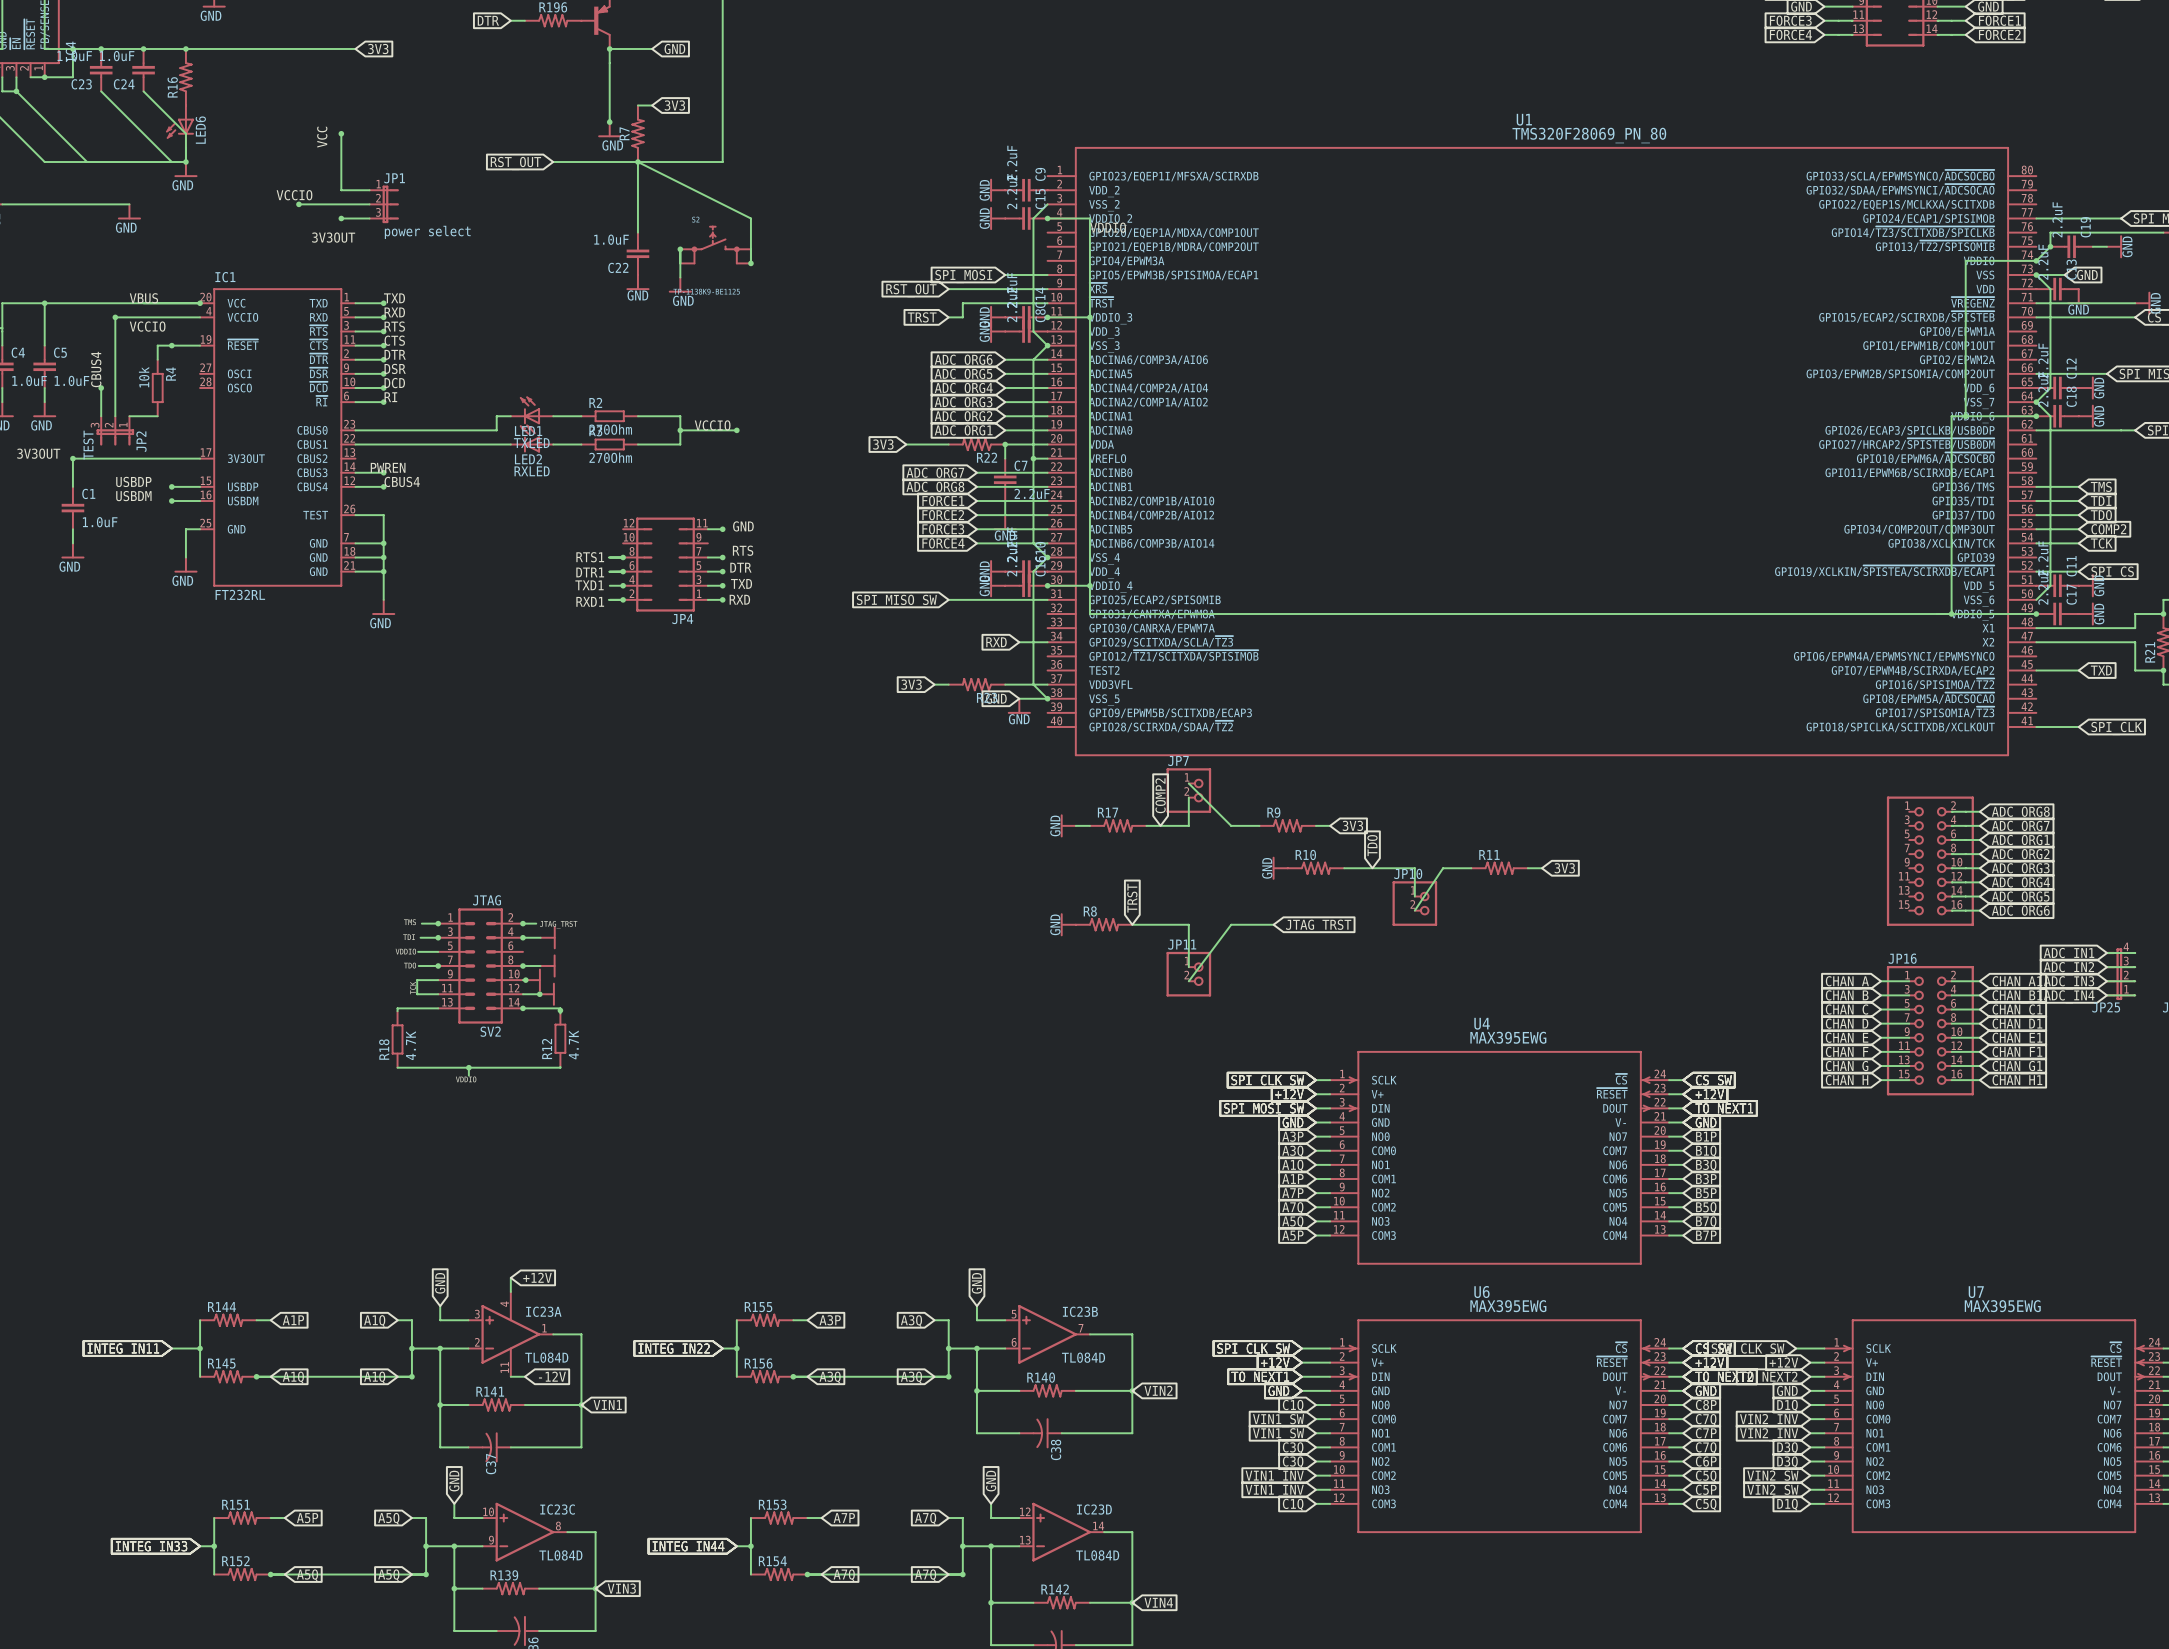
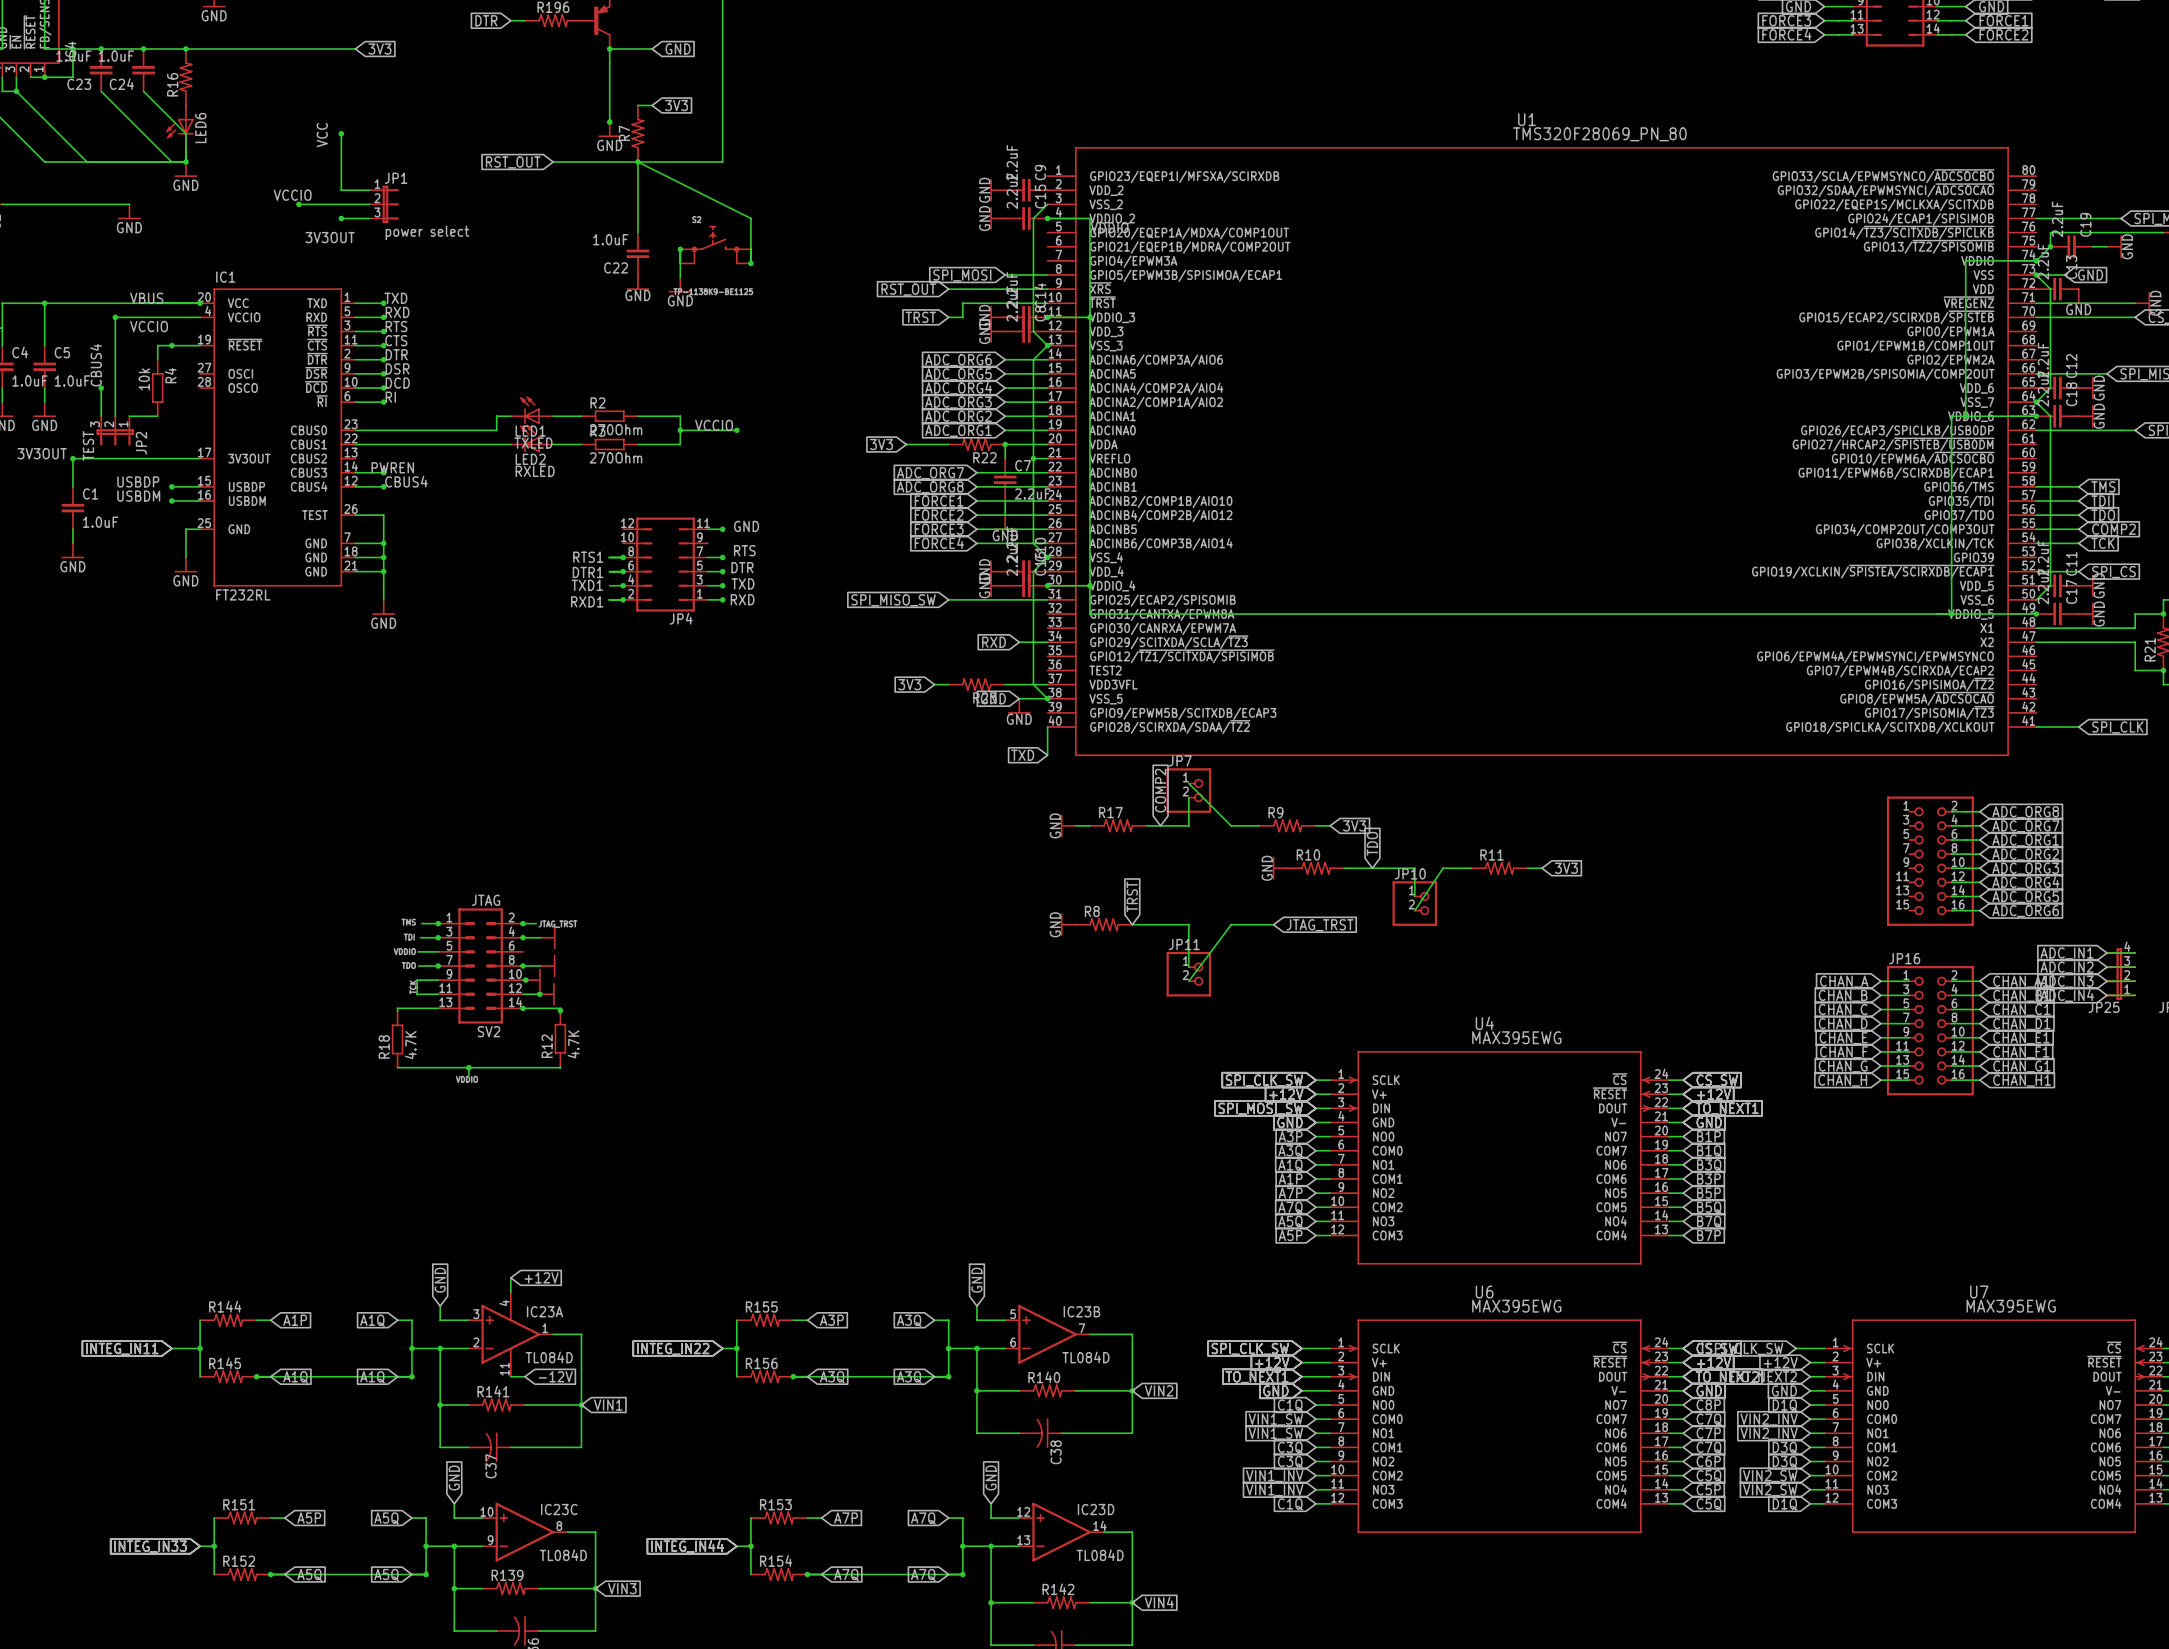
wire: (2036, 670) (2078, 670) -> none
global label: TXD (2101, 670) -> none
wire: none -> (1047, 727) (1047, 755)
global label: none -> TXD (1022, 755)

